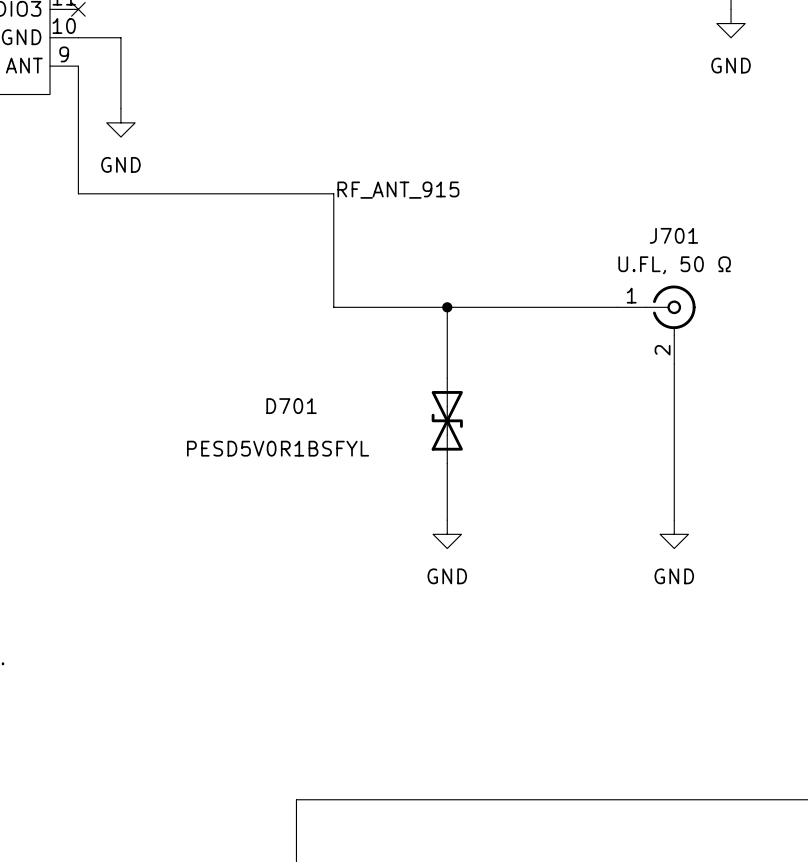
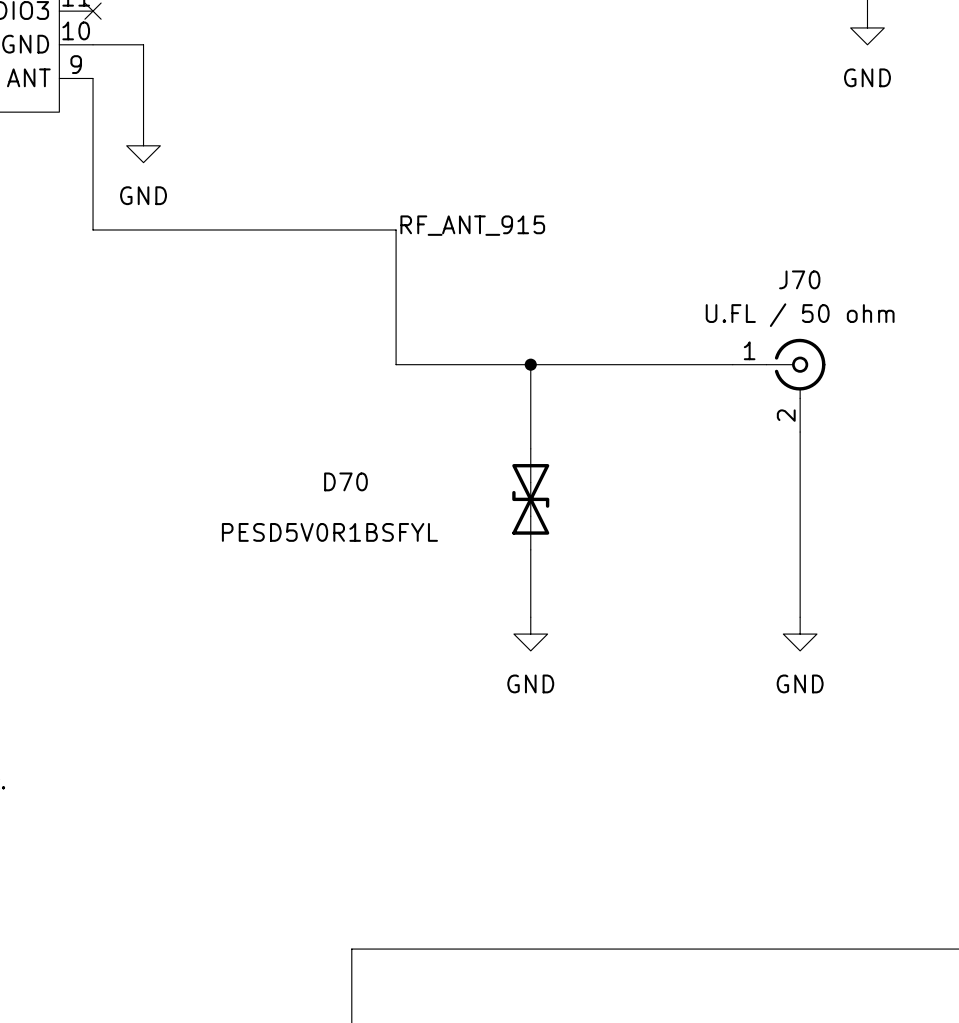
J701 name: J701 (673, 235) -> J70 (799, 279)
J701 value: U.FL, 50 Ω (674, 265) -> U.FL / 50 ohm (800, 315)
D701 name: D701 (291, 406) -> D70 (345, 481)

